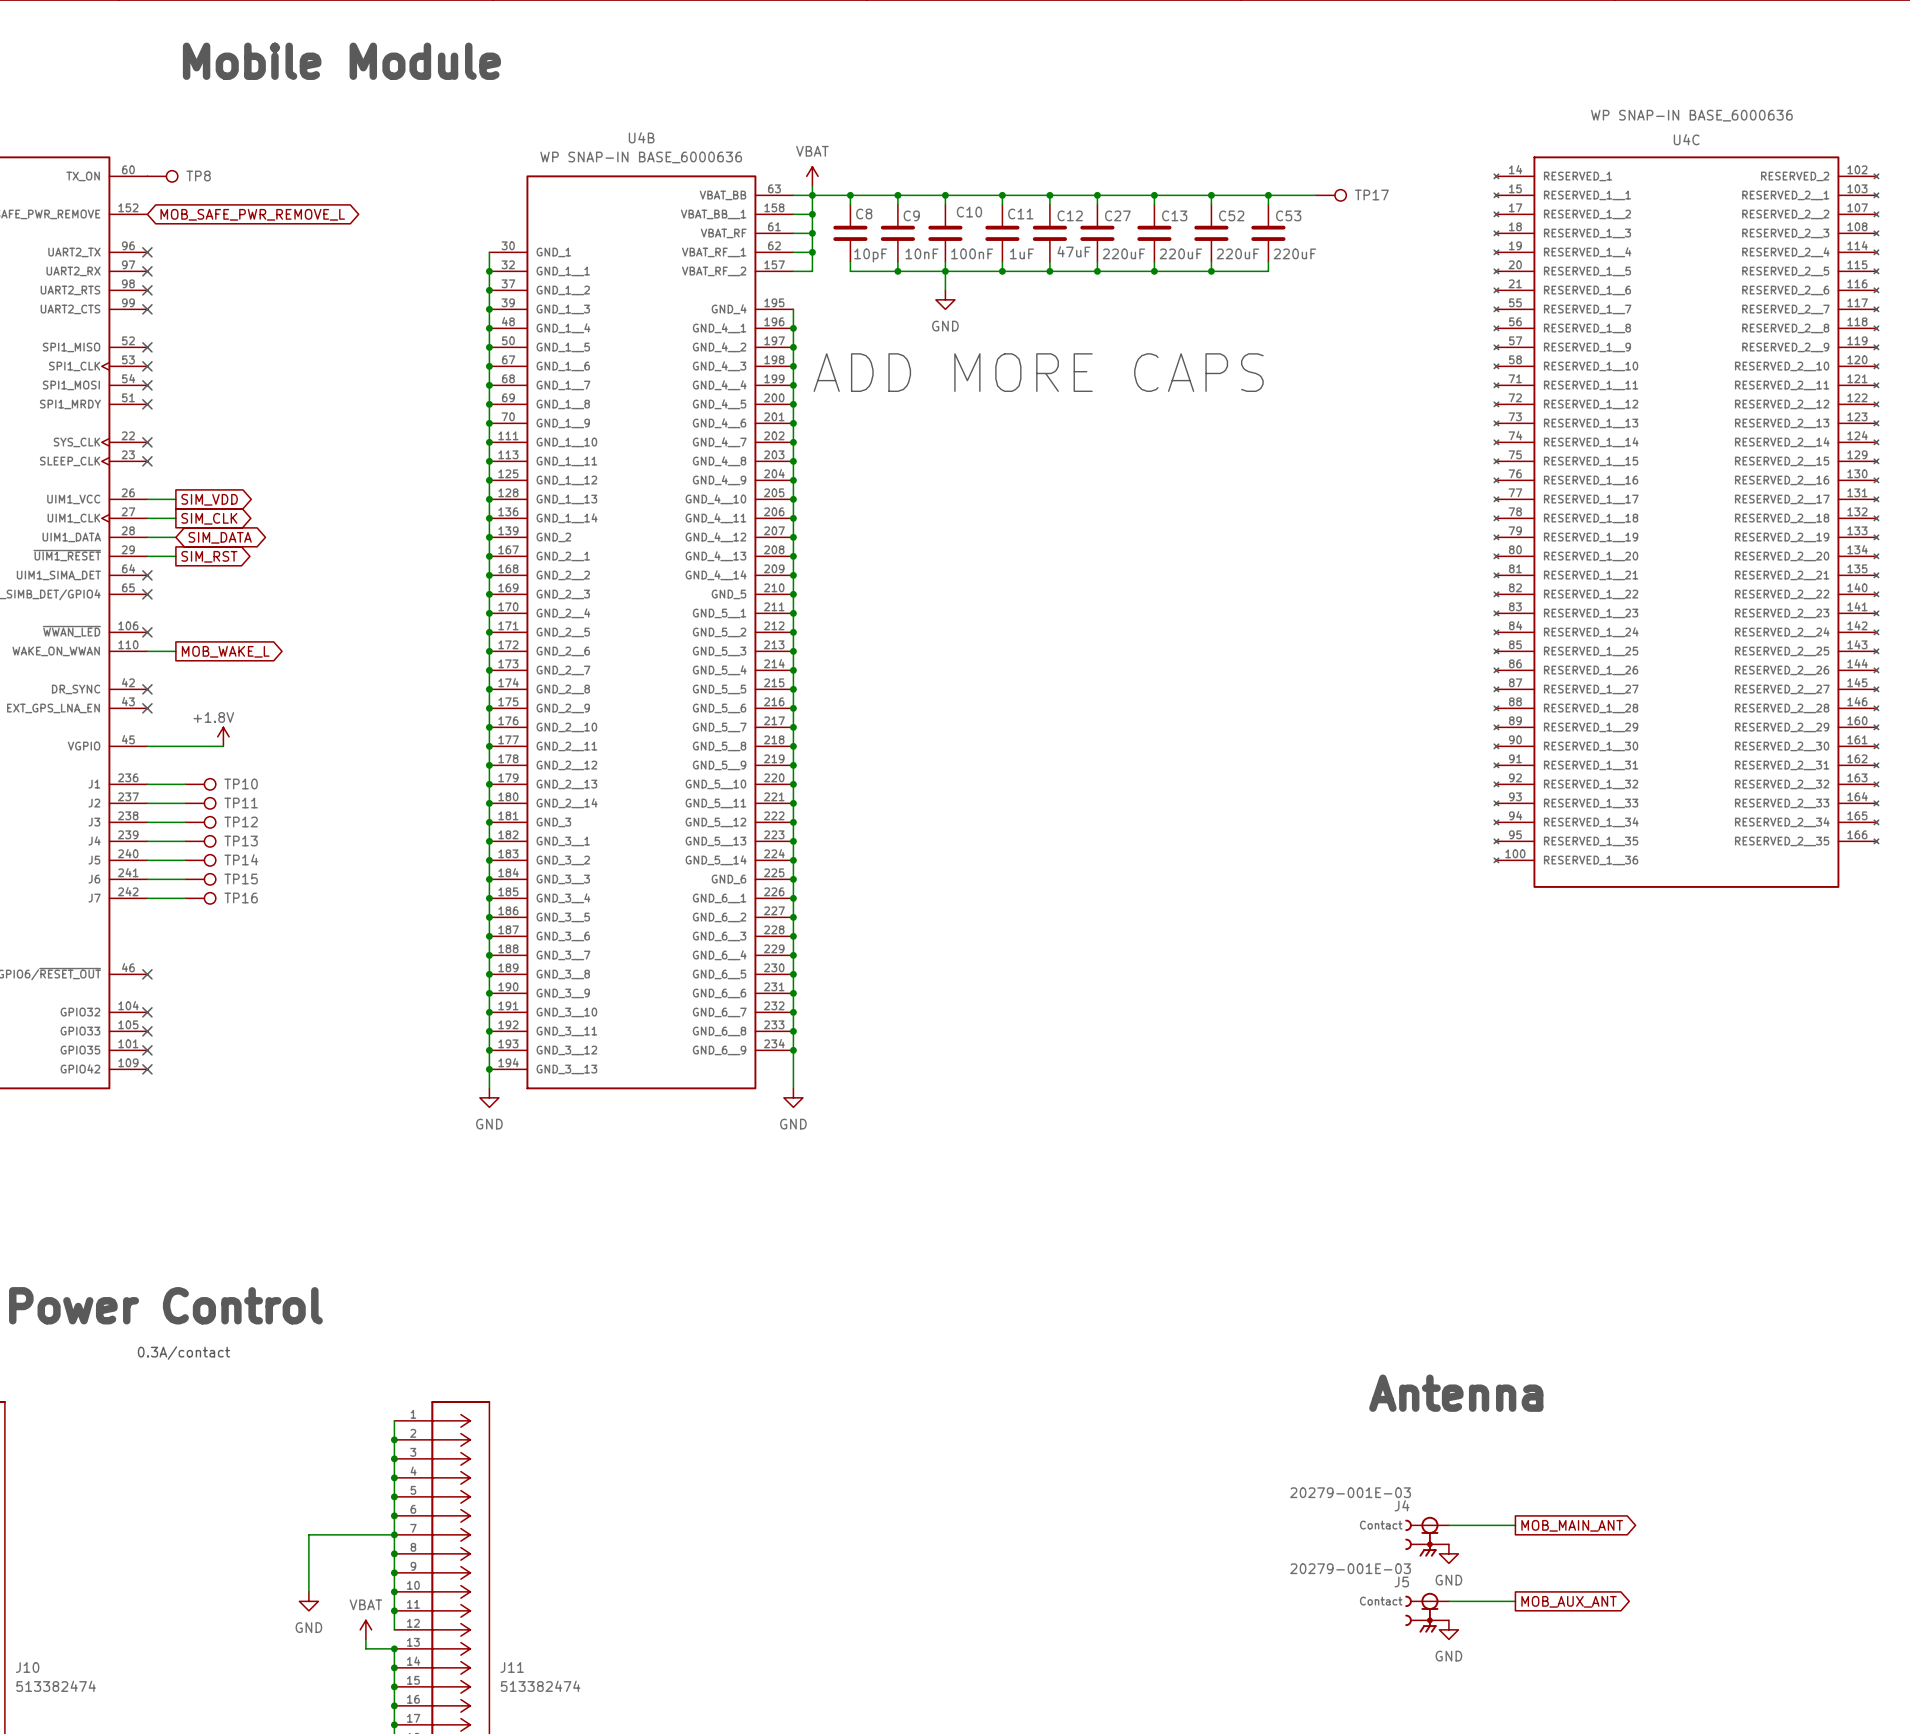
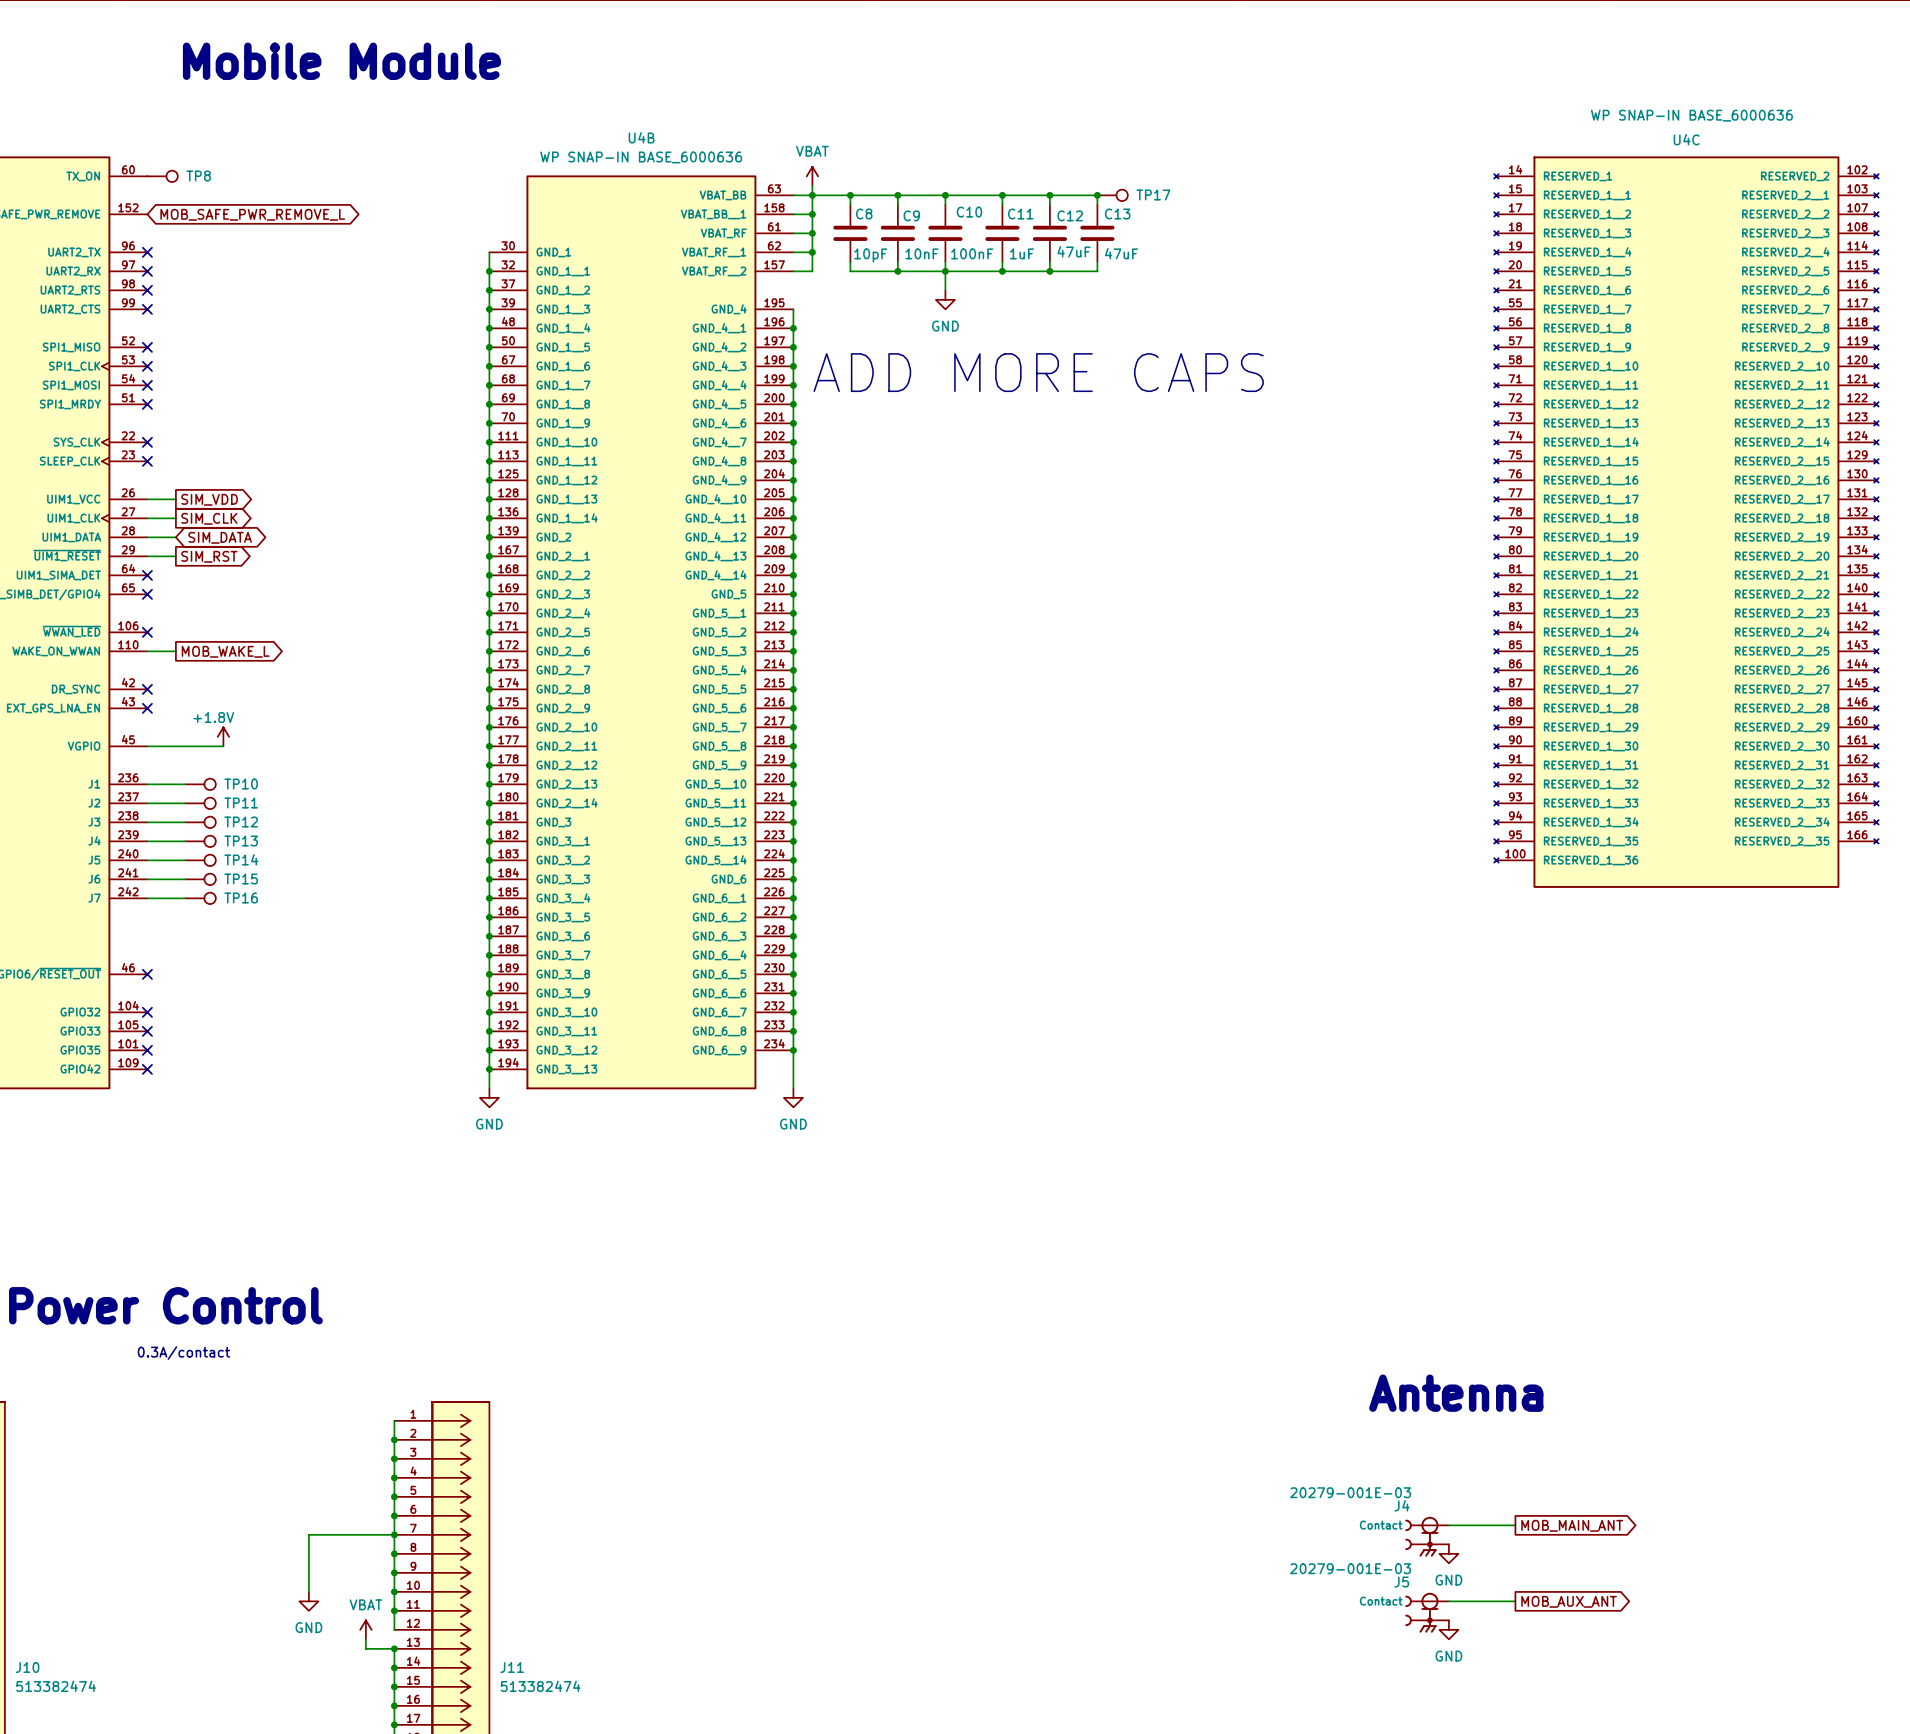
wire: (1097, 195) (1315, 195) -> none
wire: (1154, 195) (1154, 204) -> none
junction: (1154, 195) -> none
wire: (1211, 195) (1211, 204) -> none
junction: (1211, 195) -> none
wire: (1268, 195) (1268, 204) -> none
junction: (1268, 195) -> none
TP17 position: (1331, 195) -> (1112, 195)
C27 name: C27 (1117, 215) -> C13 (1117, 213)
C13: 220uF (1154, 233) -> none
C52: 220uF (1211, 233) -> none
C53: 220uF (1268, 233) -> none
C27 value: 220uF (1123, 253) -> 47uF (1121, 253)
wire: (1154, 261) (1154, 271) -> none
wire: (1211, 261) (1211, 271) -> none
wire: (1268, 261) (1268, 271) (1097, 271) -> none
junction: (1097, 271) -> none
junction: (1154, 271) -> none
junction: (1211, 271) -> none

